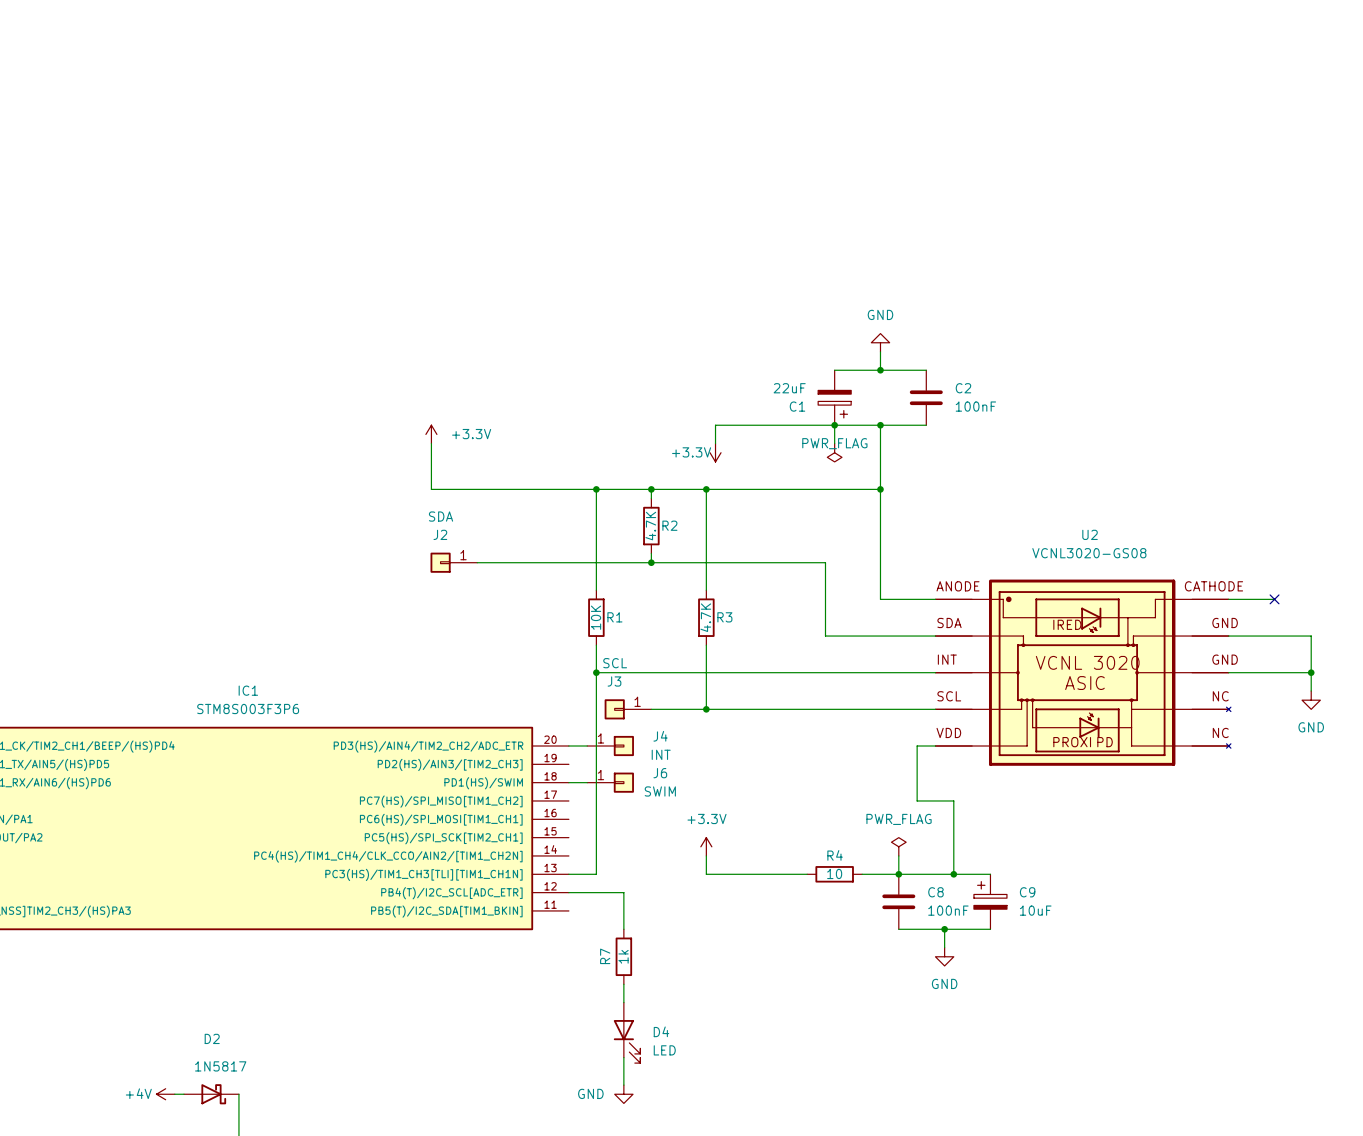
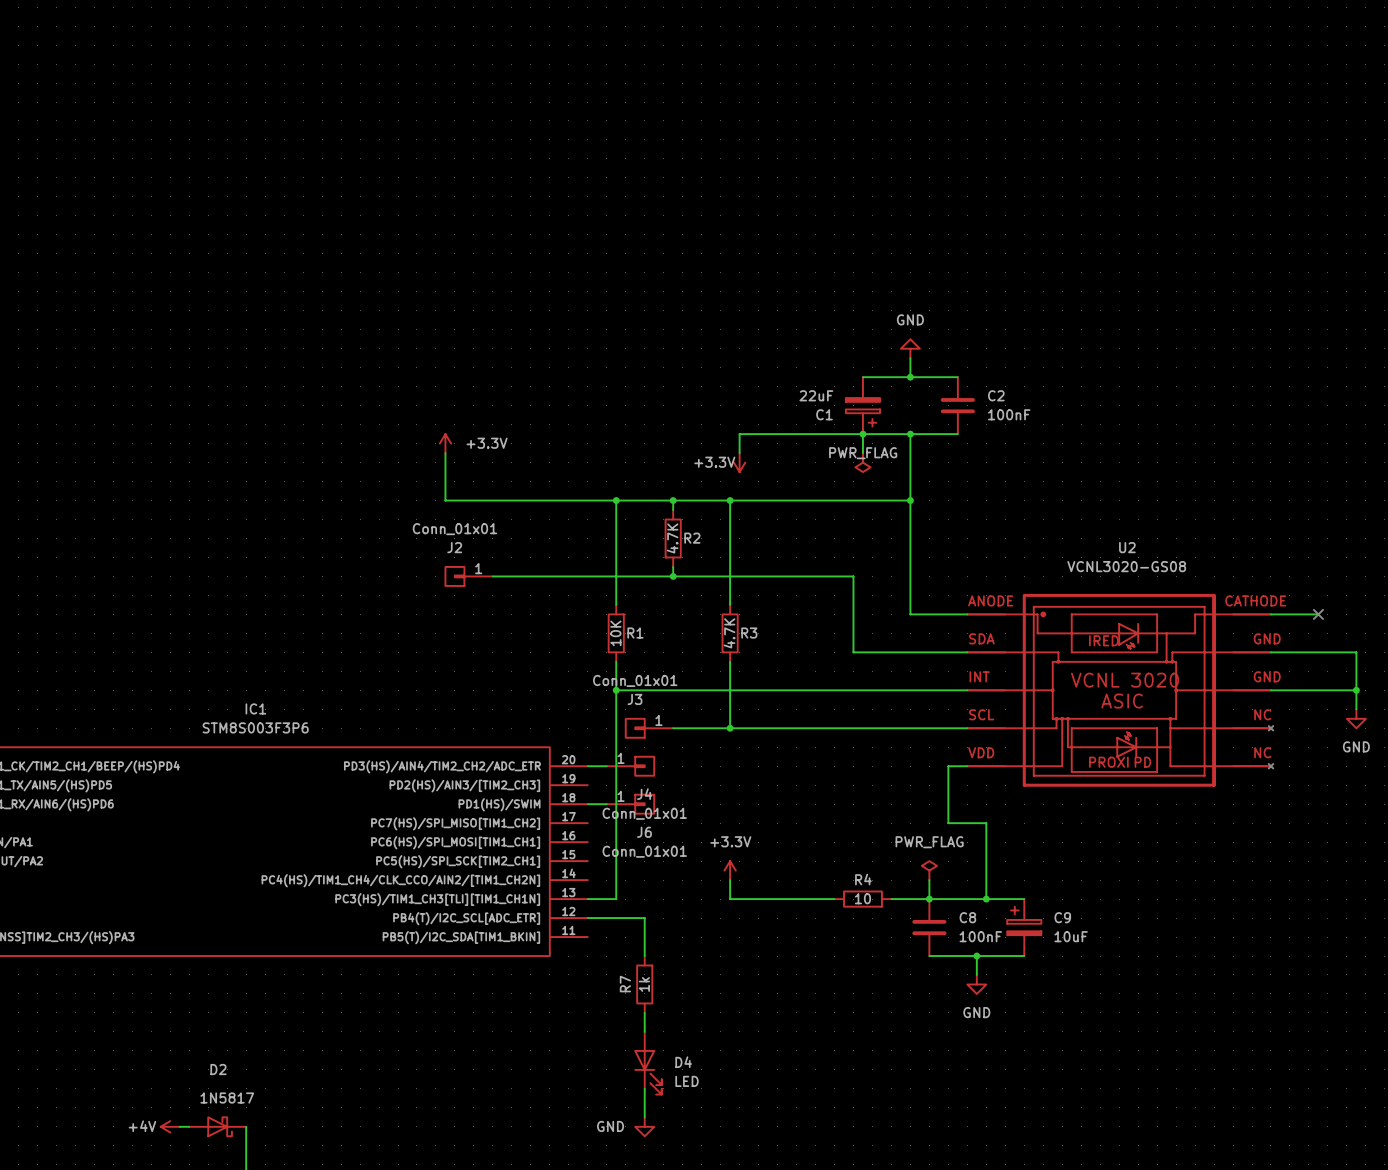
J2 value: SDA (441, 516) -> Conn_01x01 (454, 529)
J3 value: SCL (615, 663) -> Conn_01x01 (635, 680)
J4 name position: J4 (660, 736) -> J4 (644, 794)
J4 value: INT (661, 754) -> Conn_01x01 (644, 813)
J6 name position: J6 (660, 773) -> J6 (644, 832)
J6 value: SWIM (660, 791) -> Conn_01x01 (644, 851)

